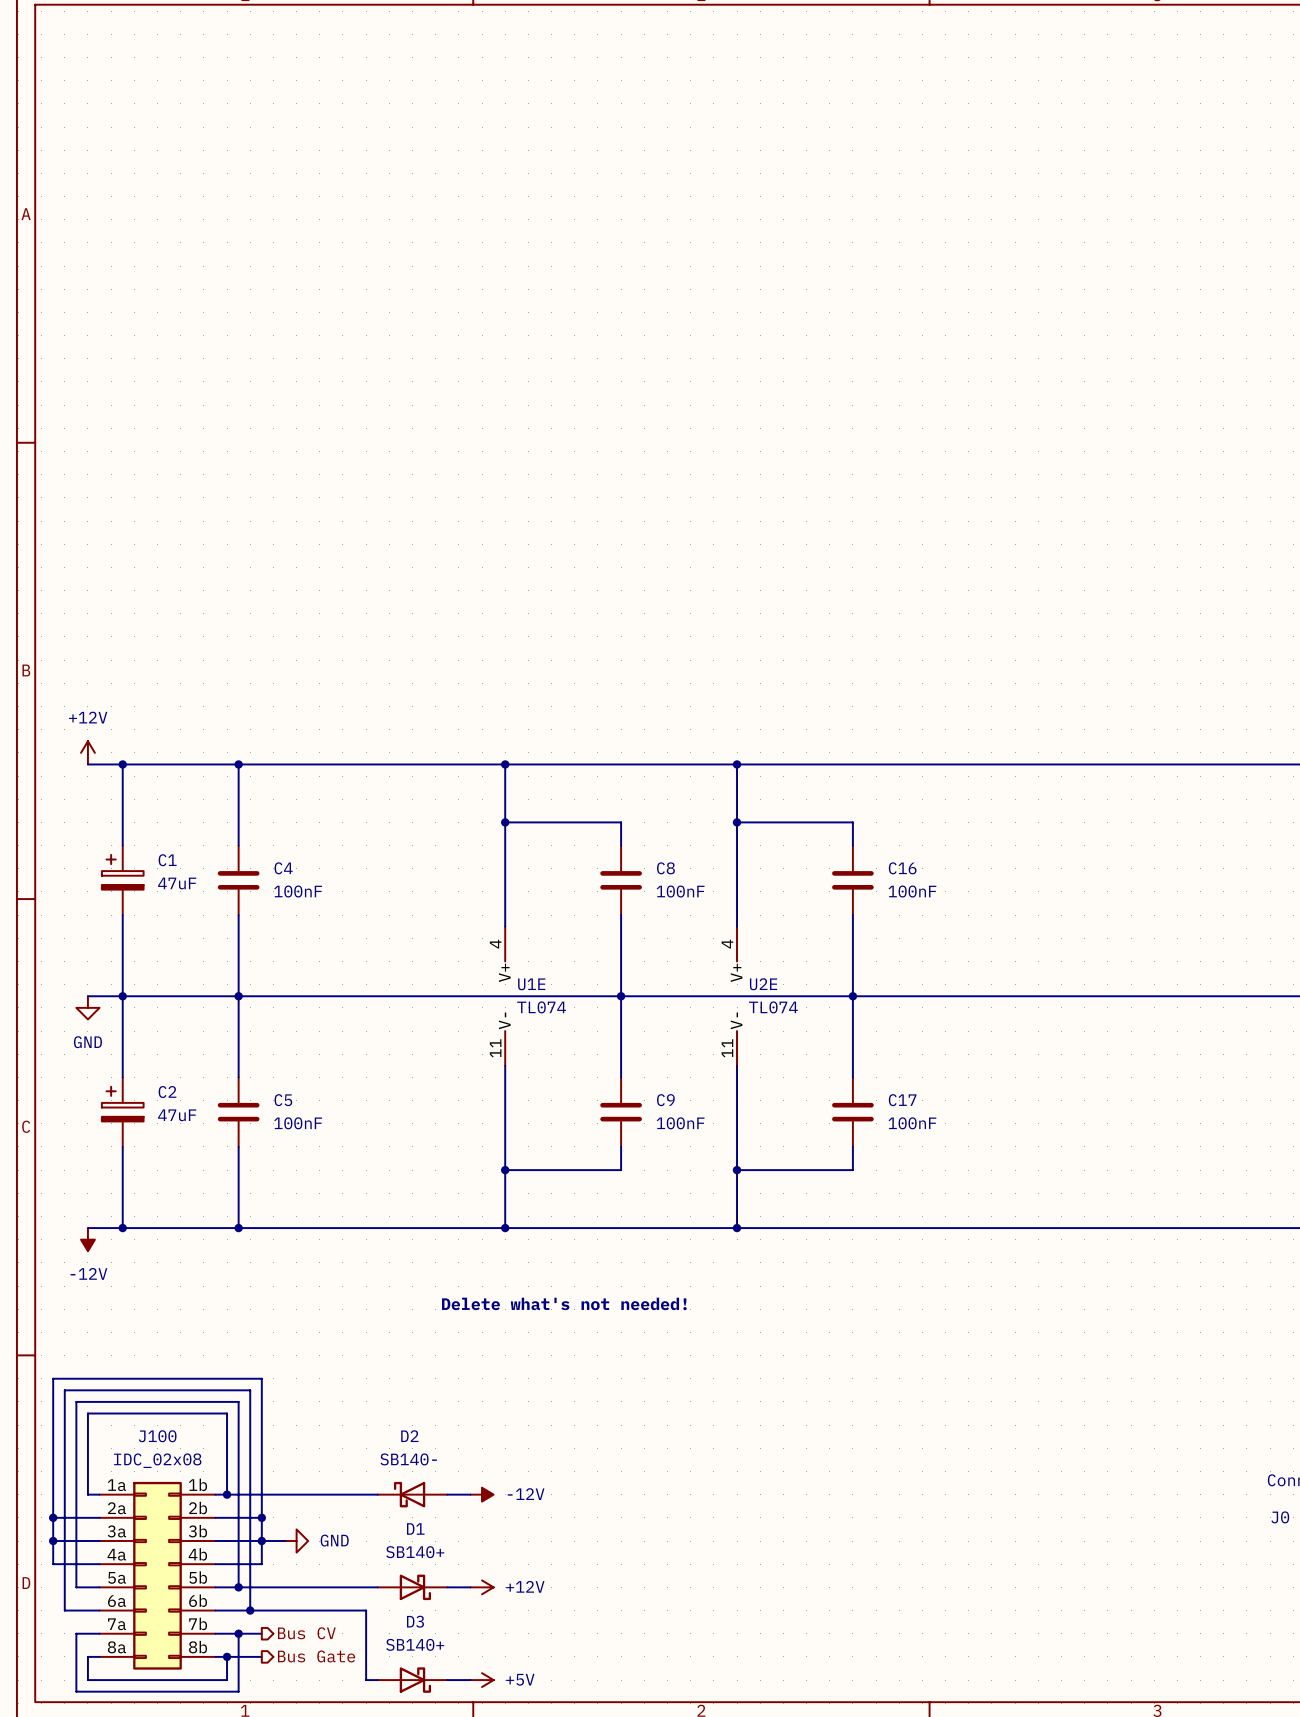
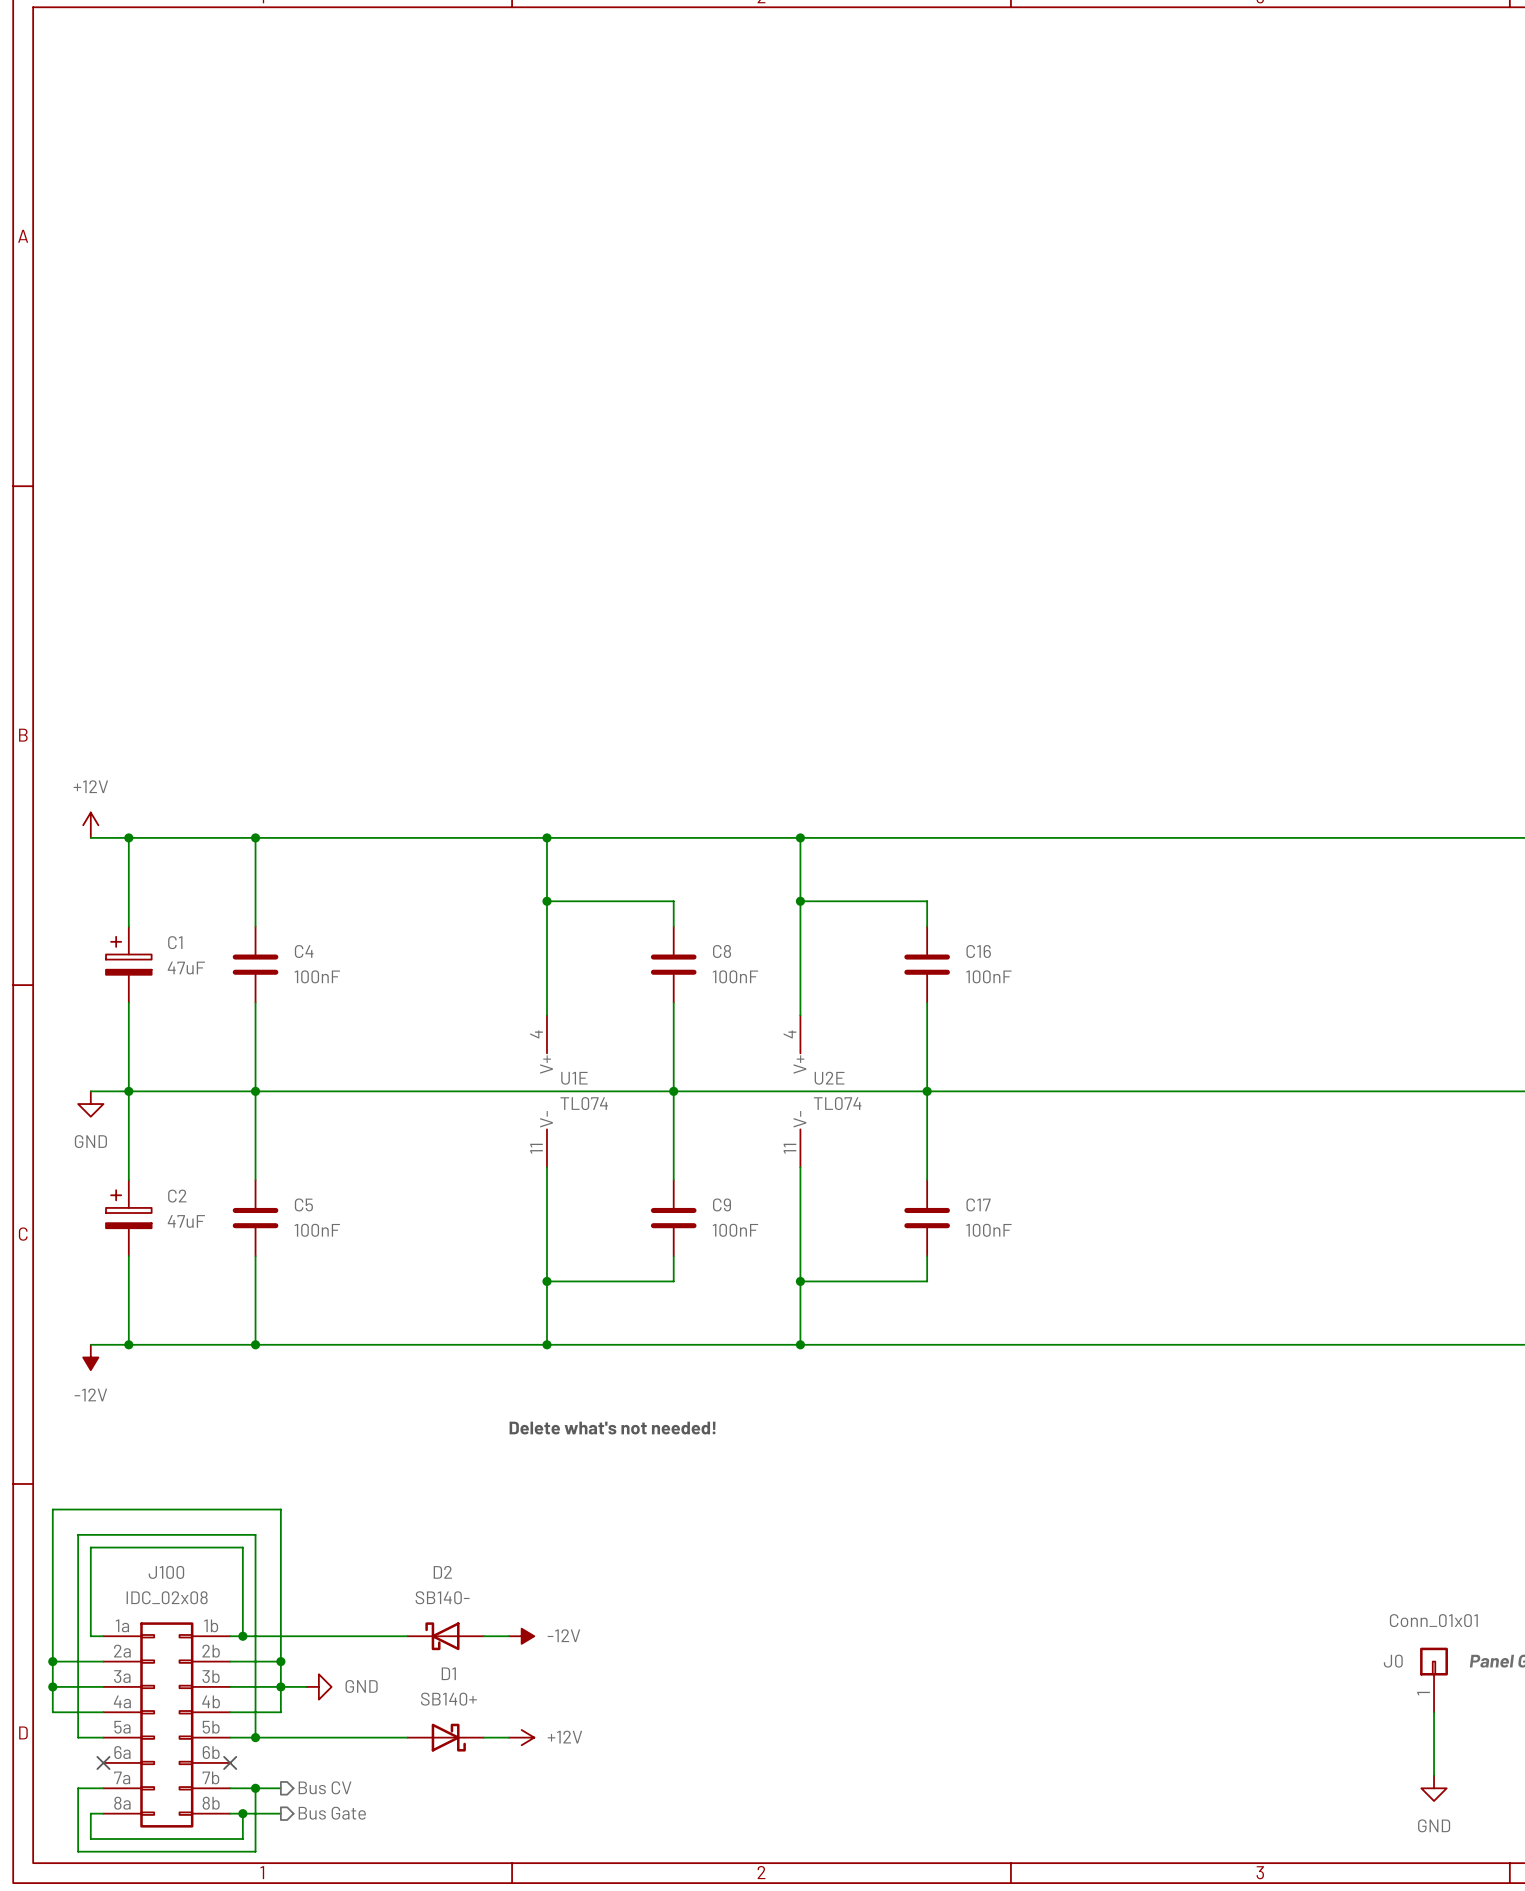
wire: (99, 1610) (64, 1610) (64, 1390) (250, 1390) (250, 1610) -> none
no-connect mark: none -> (103, 1762)
wire: (215, 1610) (366, 1610) (366, 1680) (377, 1680) -> none
no-connect mark: none -> (230, 1762)
junction: (250, 1610) -> none
D3: SB140+ (412, 1680) -> none
wire: (447, 1680) (470, 1680) -> none
power symbol: +5V (482, 1680) -> none

